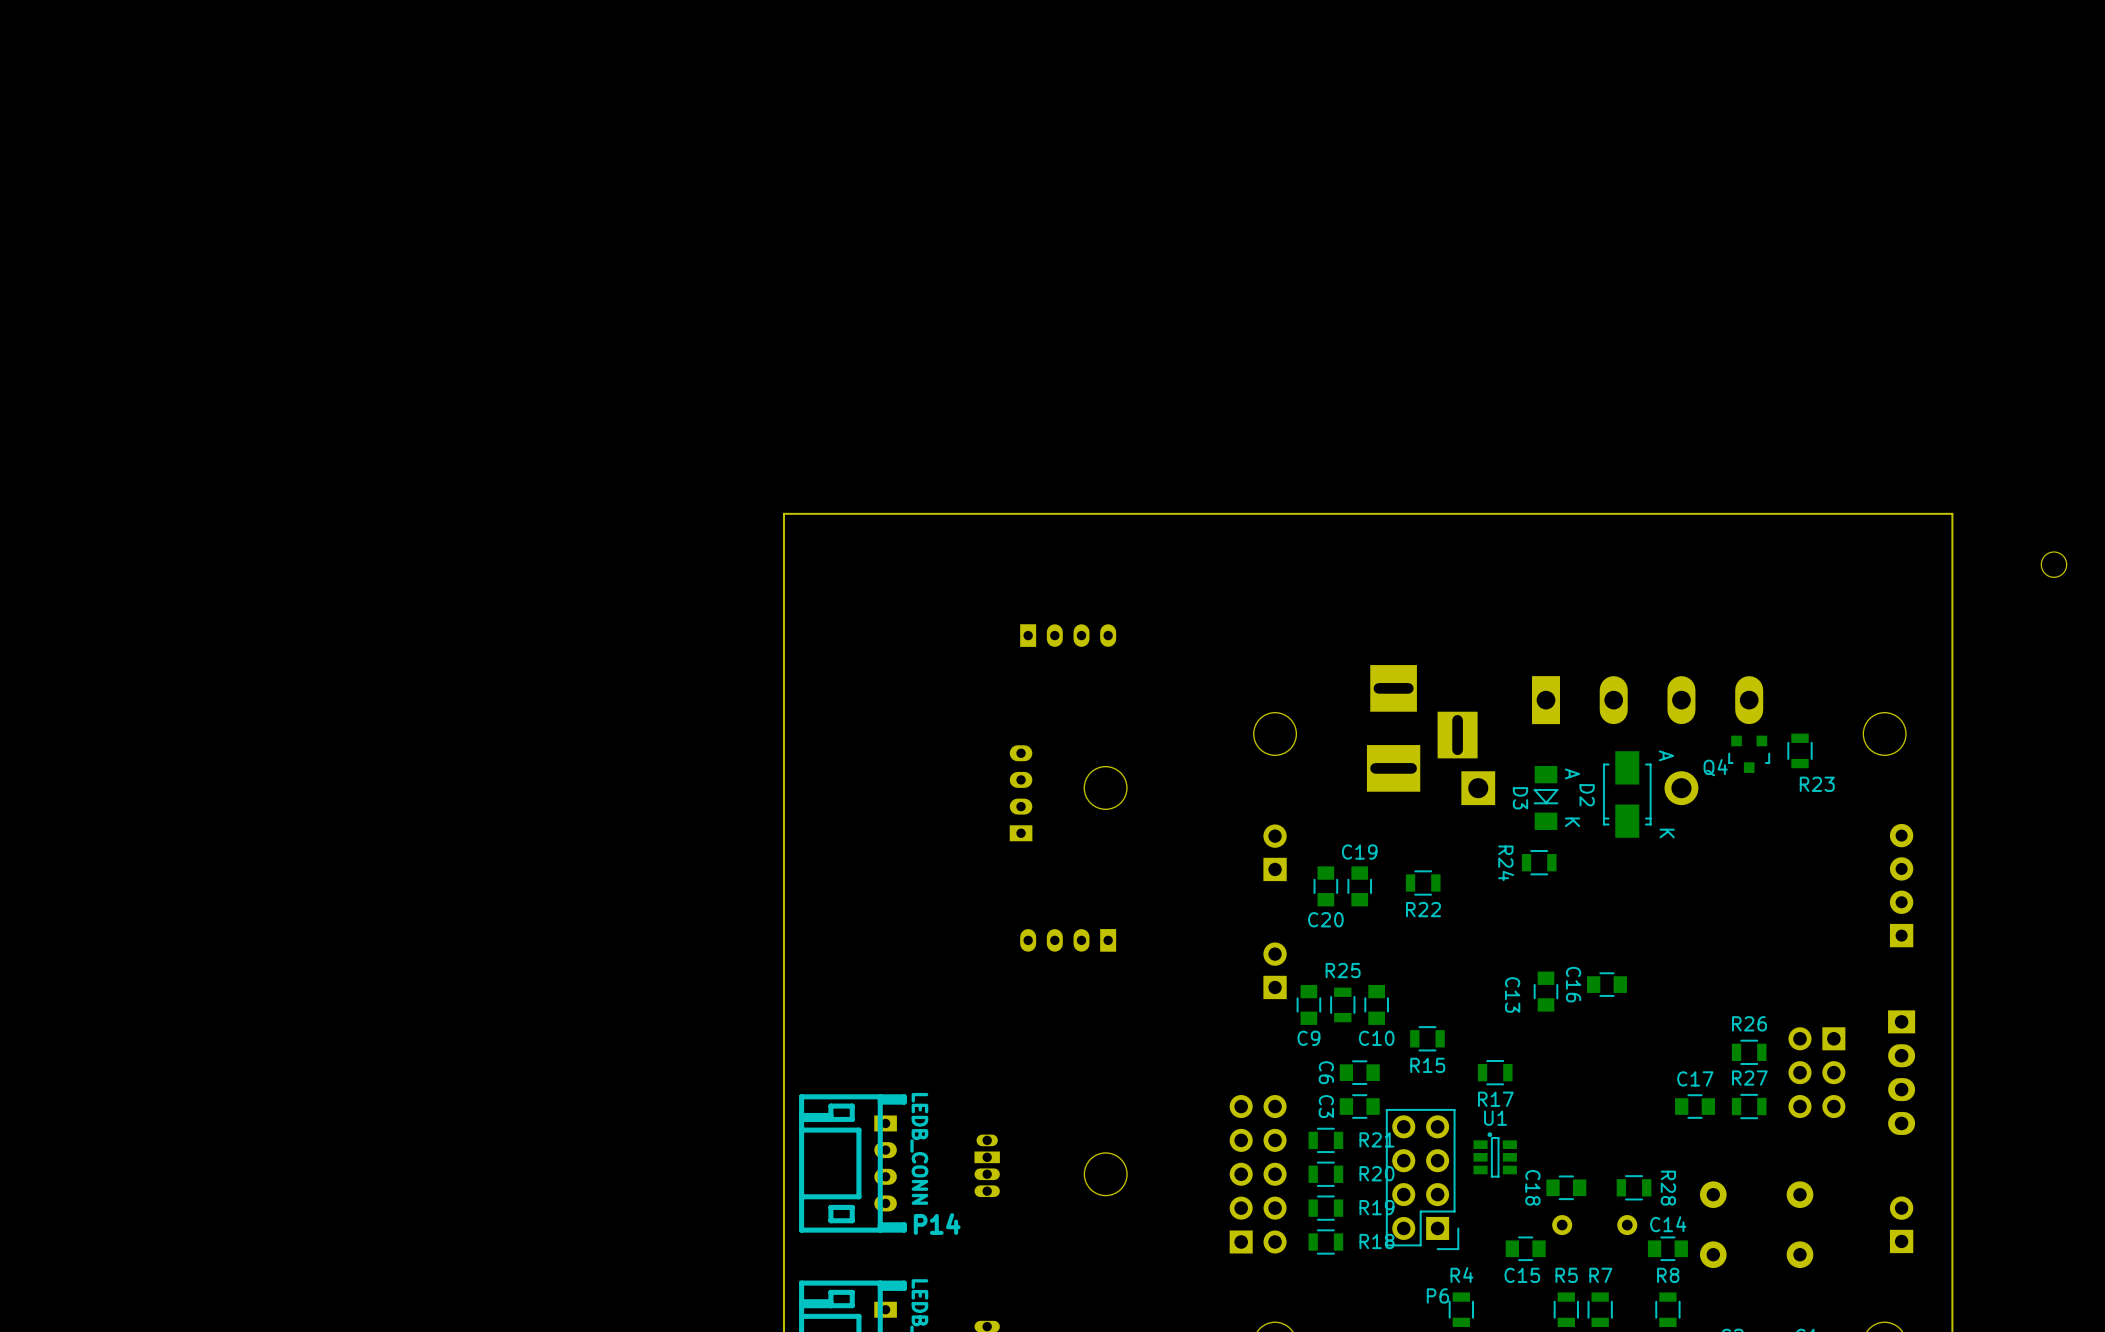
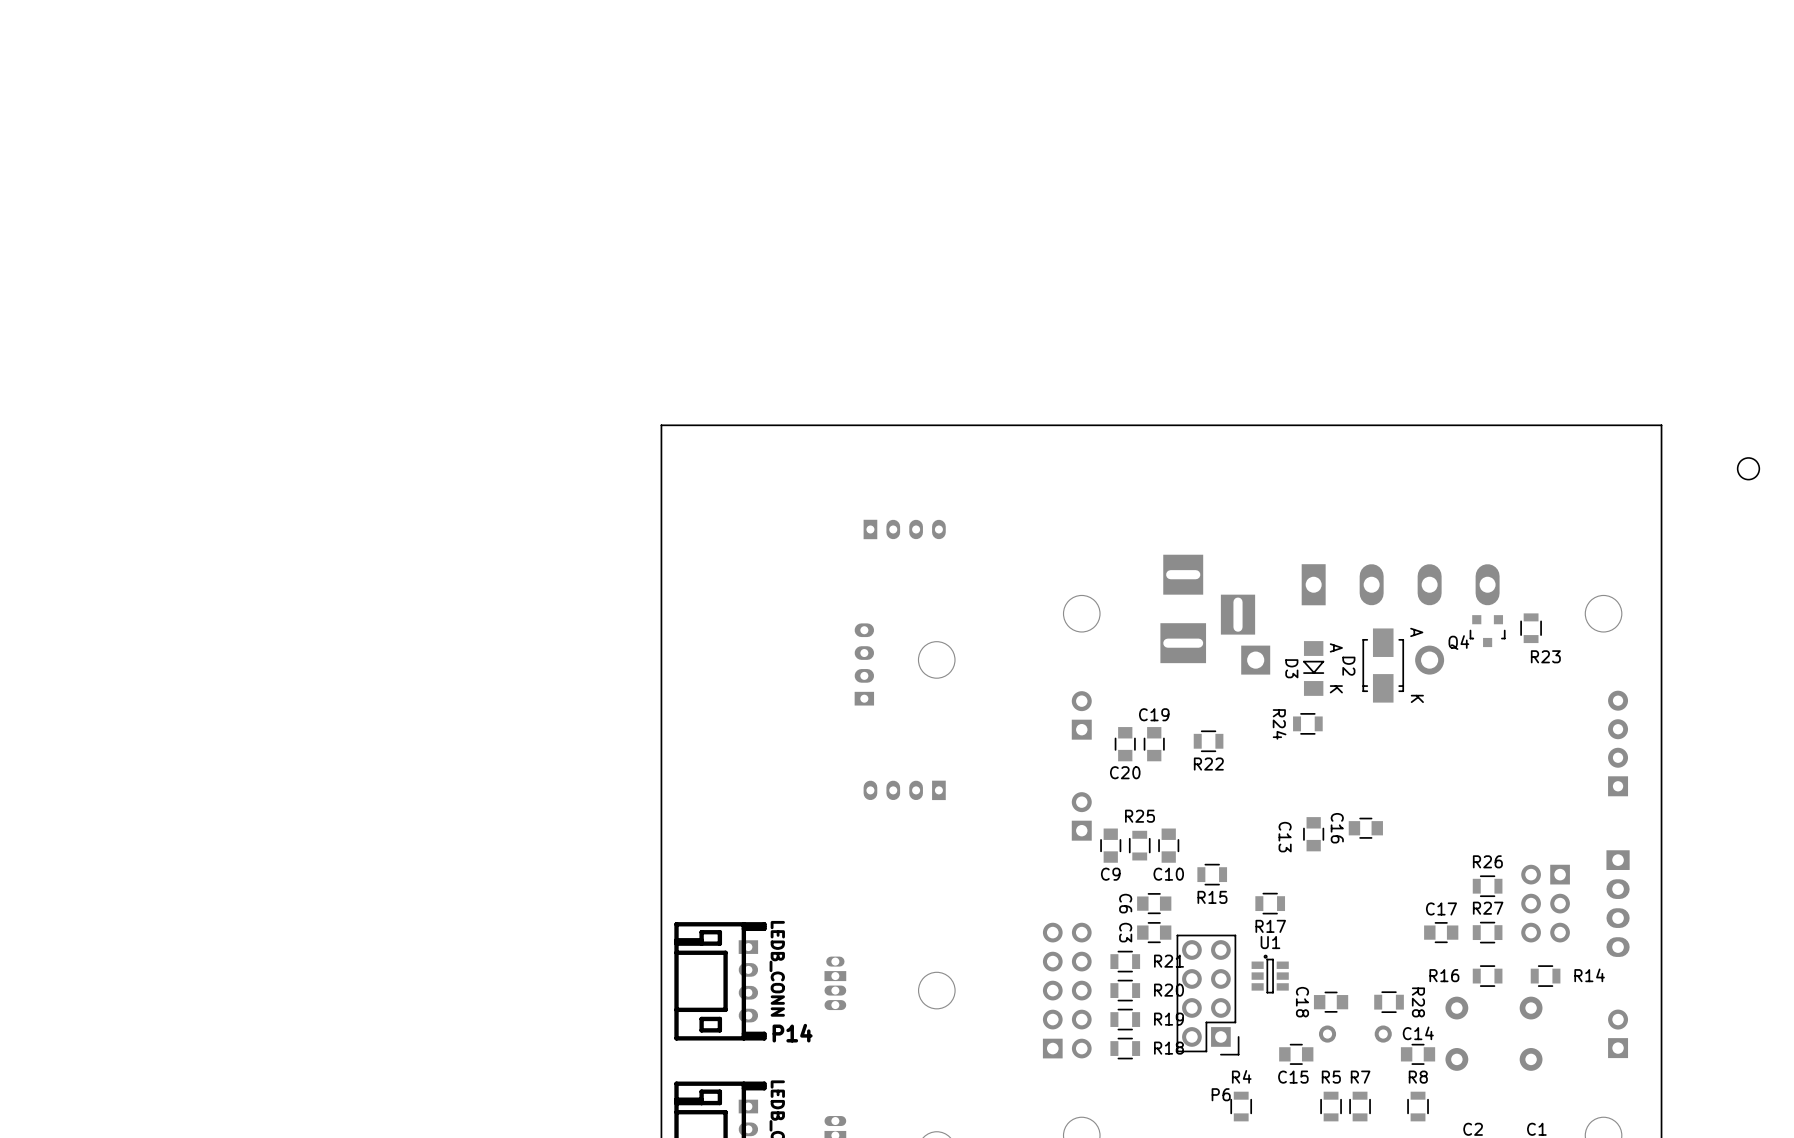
R16: none -> (1487, 976)
R14: none -> (1545, 976)

